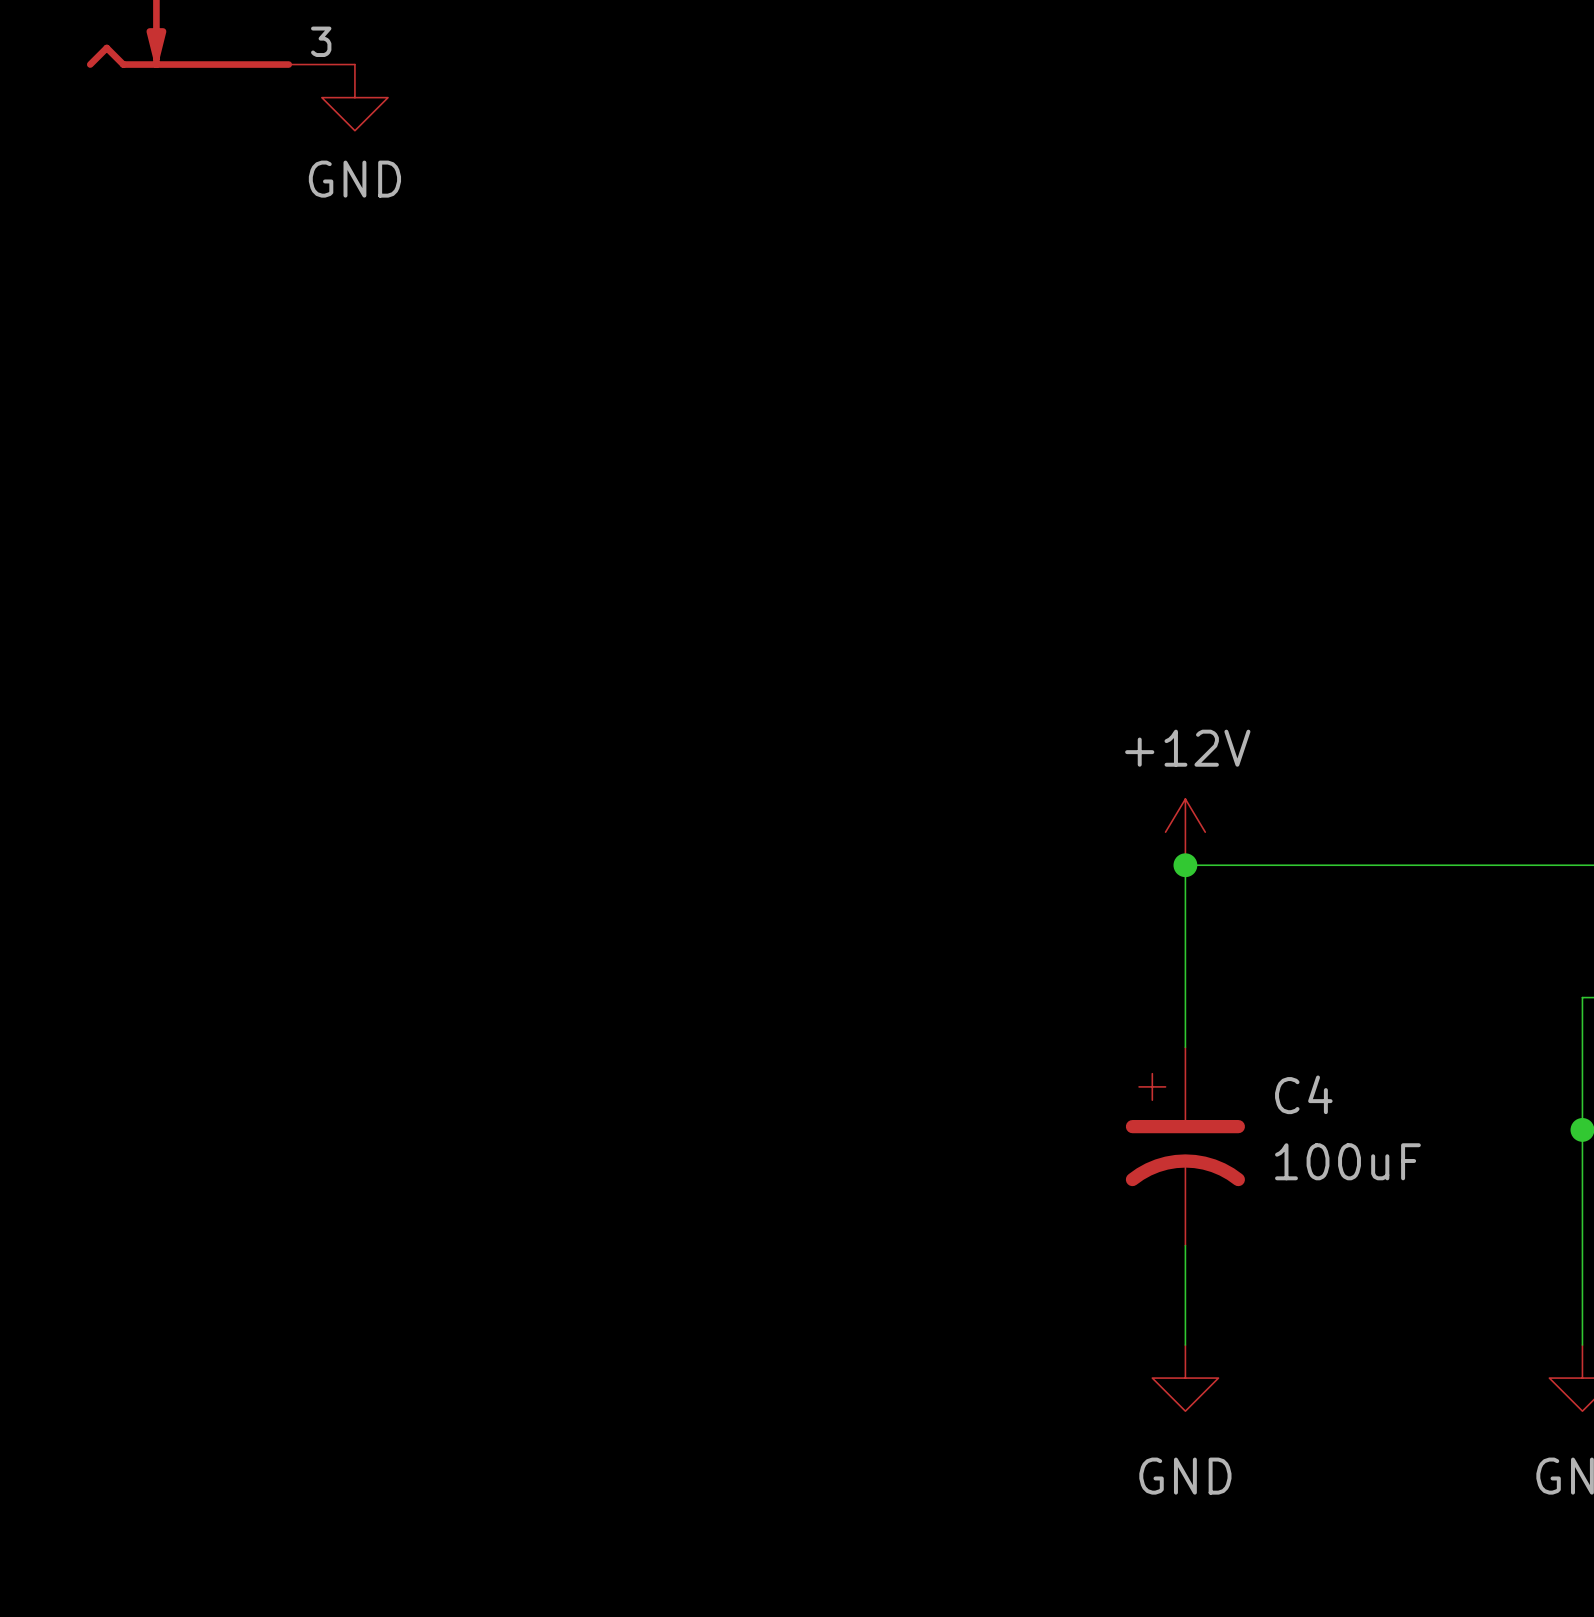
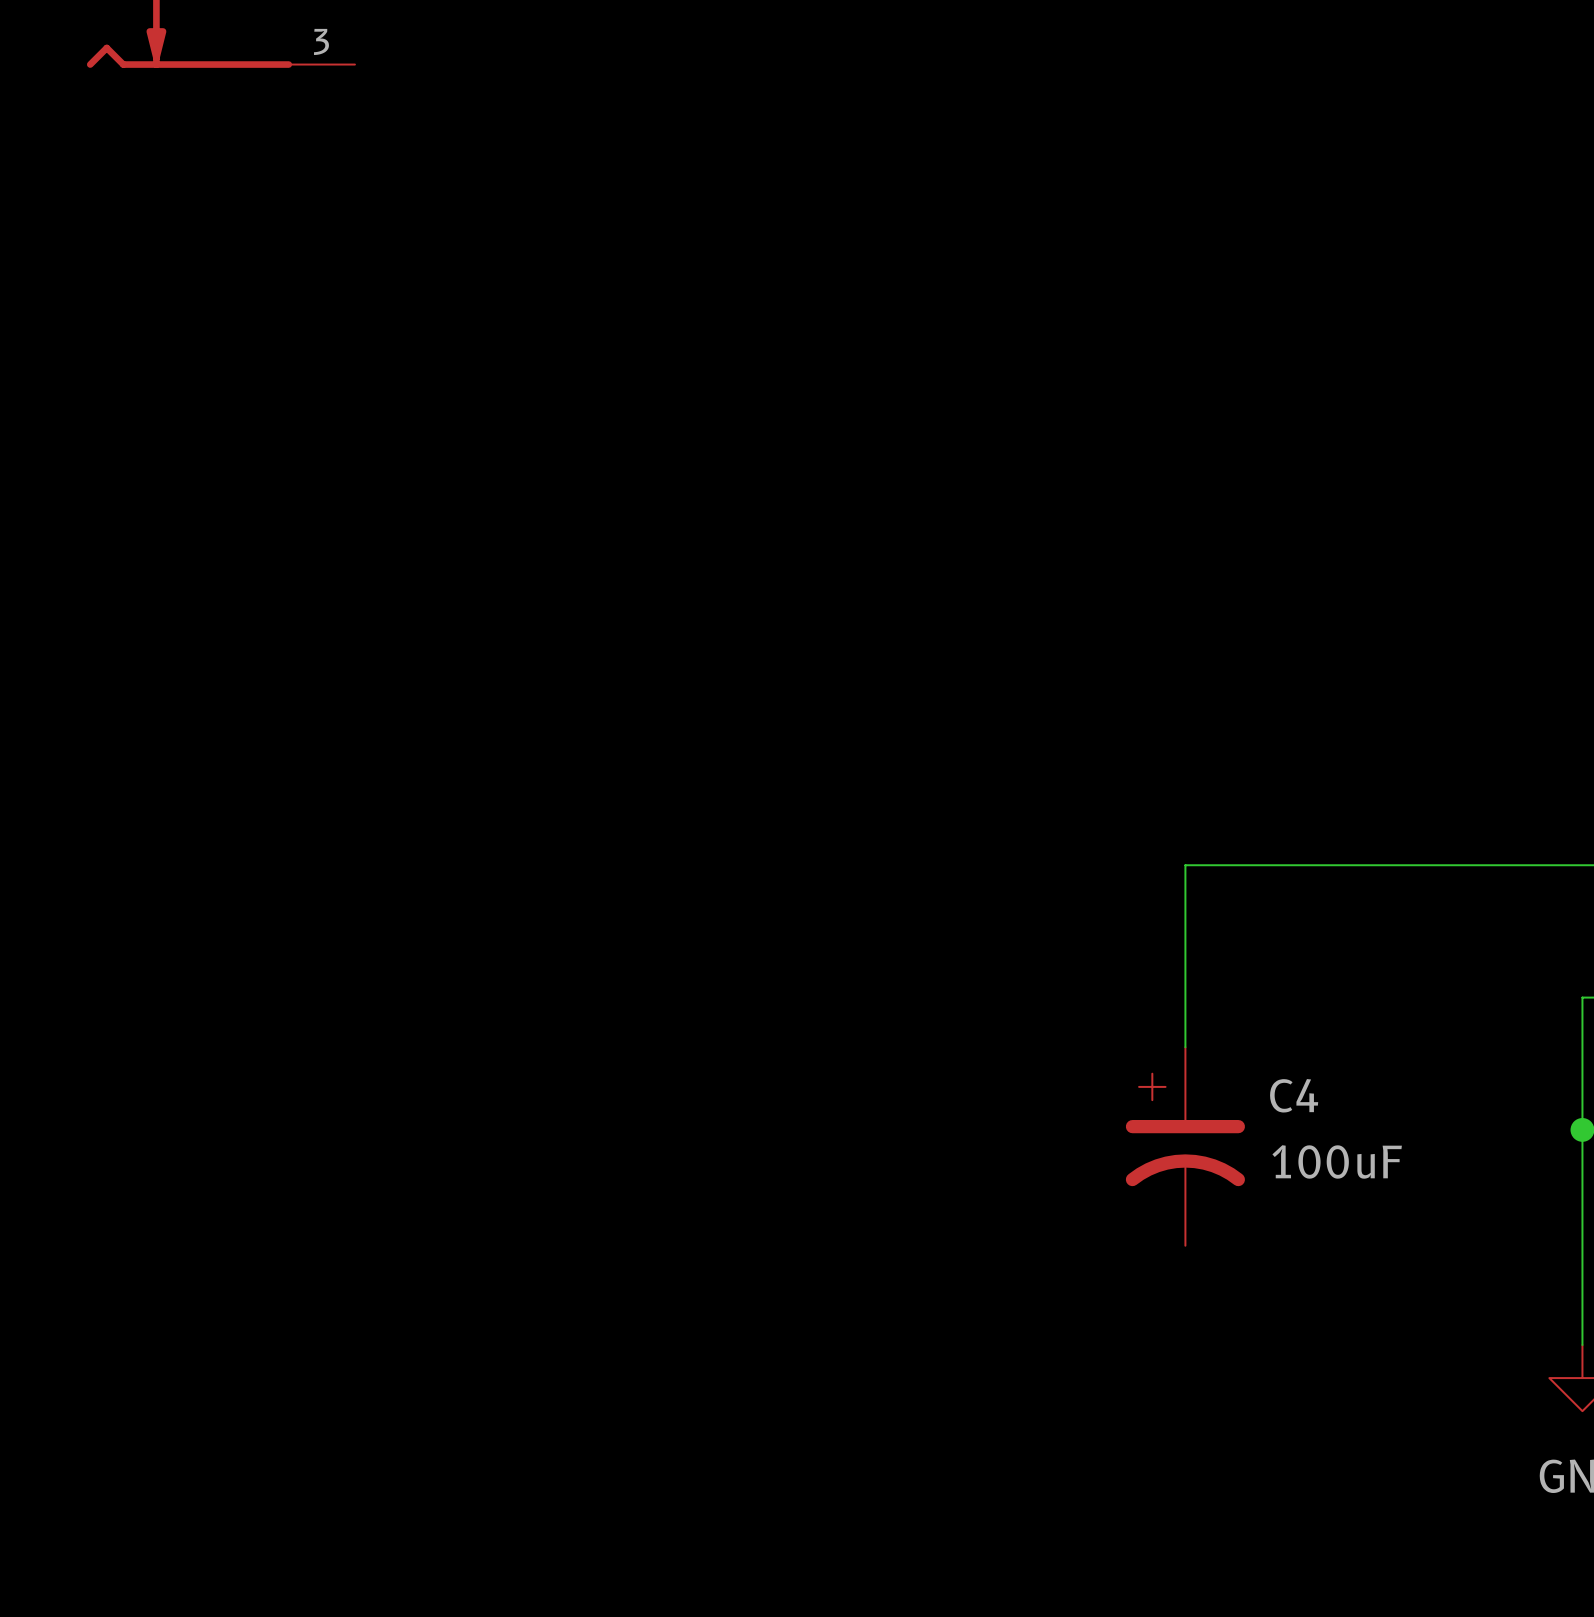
power symbol: GND (354, 97) -> none
power symbol: +12V (1185, 832) -> none
junction: (1185, 865) -> none
wire: (1185, 1245) (1185, 1344) -> none
power symbol: GND (1185, 1378) -> none

